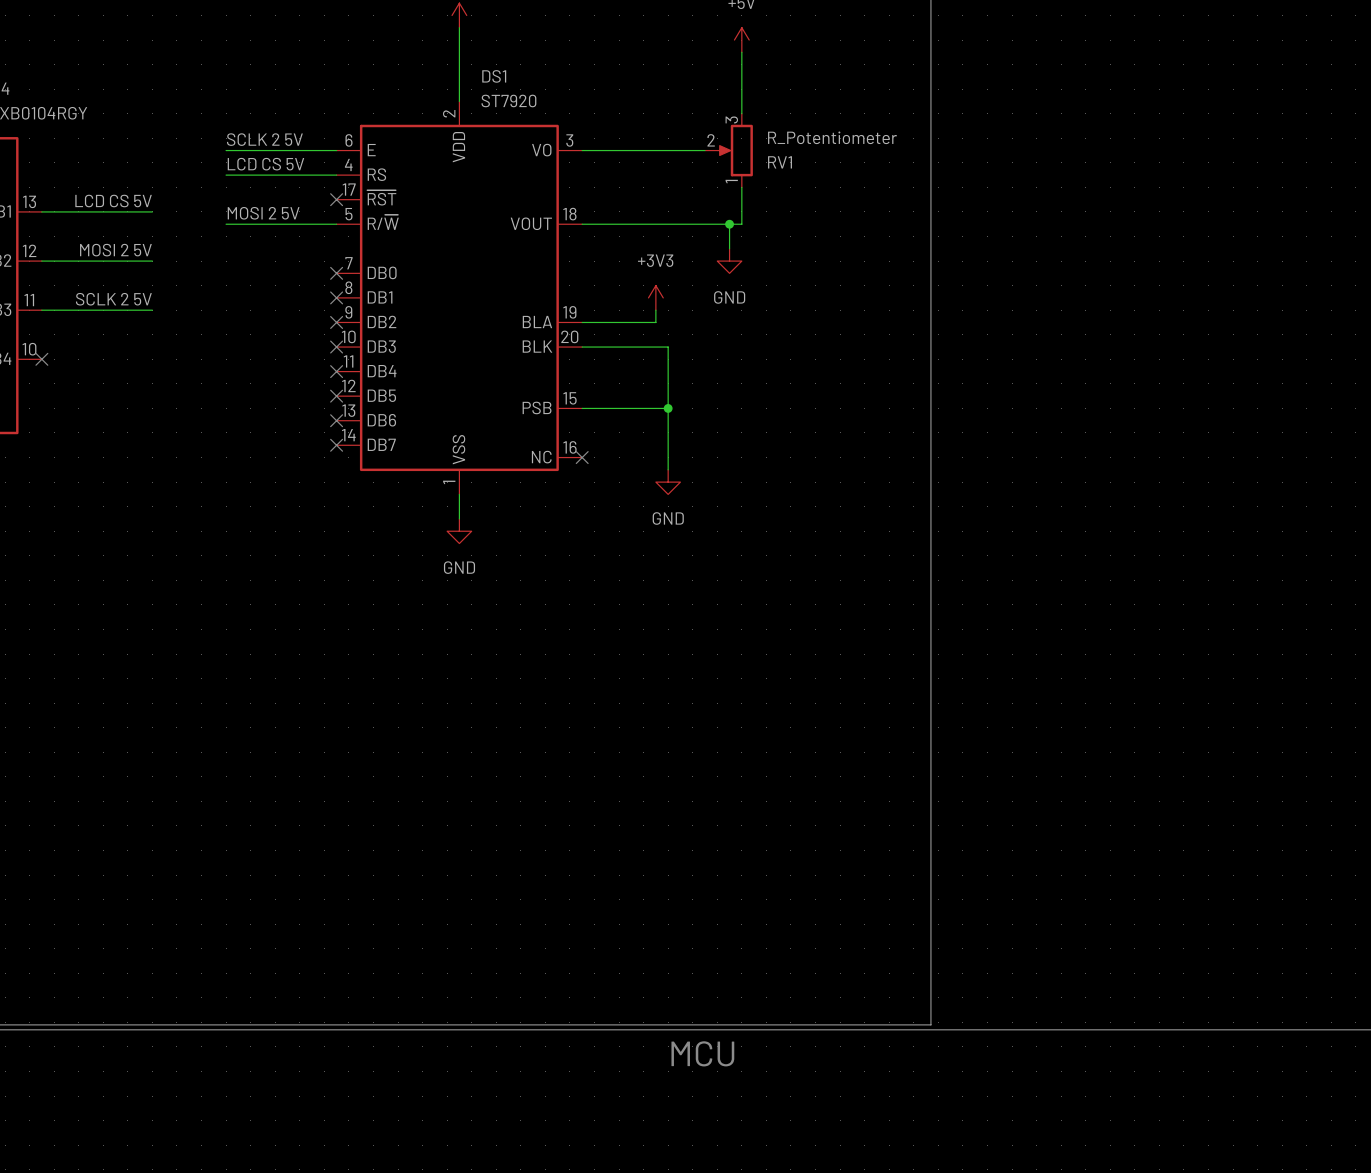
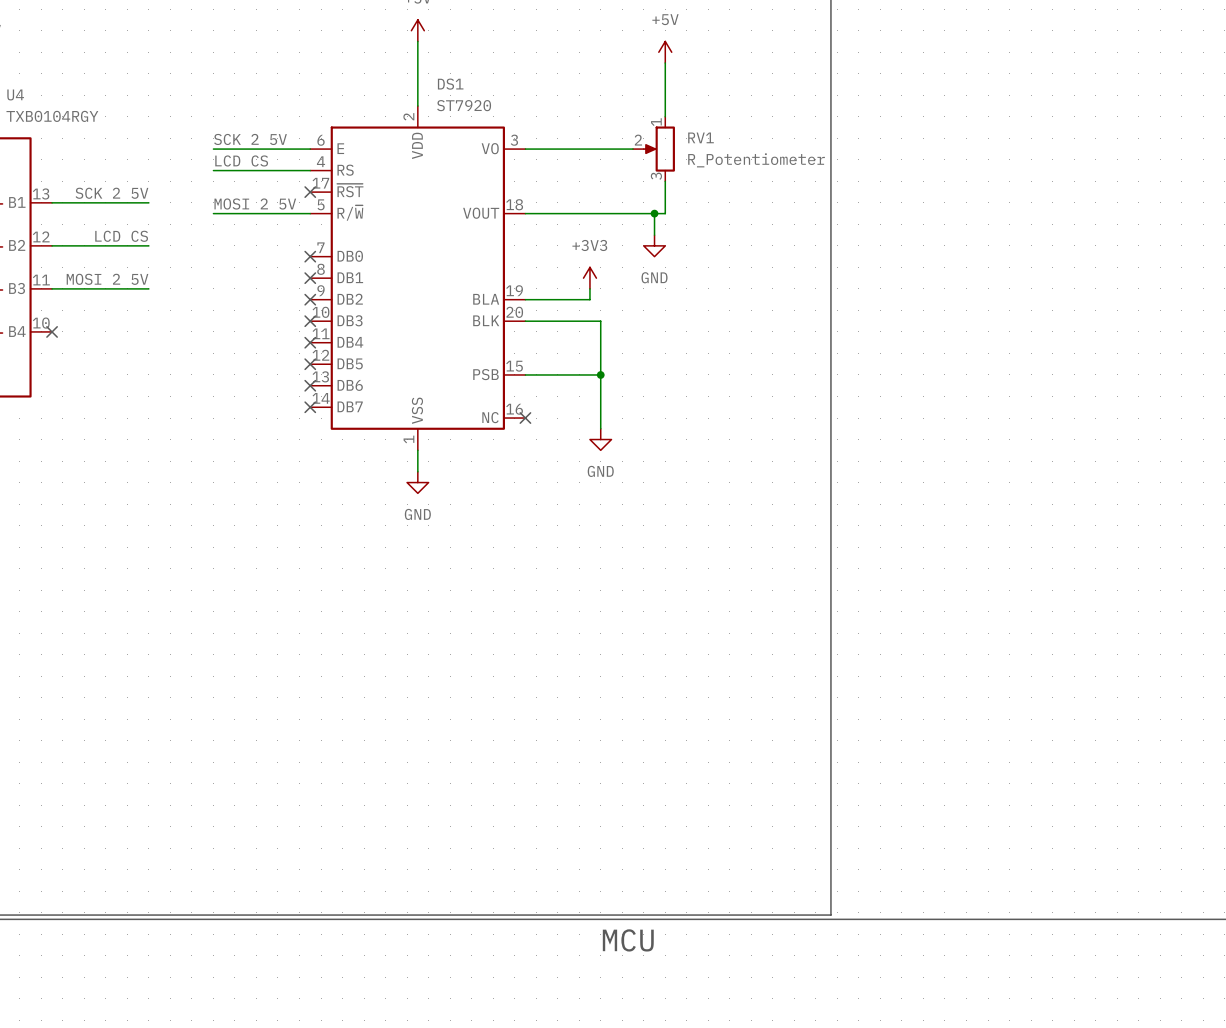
label: SCLK 2 5V (264, 139) -> SCK 2 5V (250, 139)
RV1 flip: as is (735, 150) -> up-down (659, 149)
label: LCD CS 5V (265, 164) -> LCD CS (241, 160)
label: LCD CS 5V (113, 201) -> SCK 2 5V (111, 193)
label: MOSI 2 5V (115, 250) -> LCD CS (121, 236)
label: SCLK 2 5V (113, 299) -> MOSI 2 5V (107, 279)

